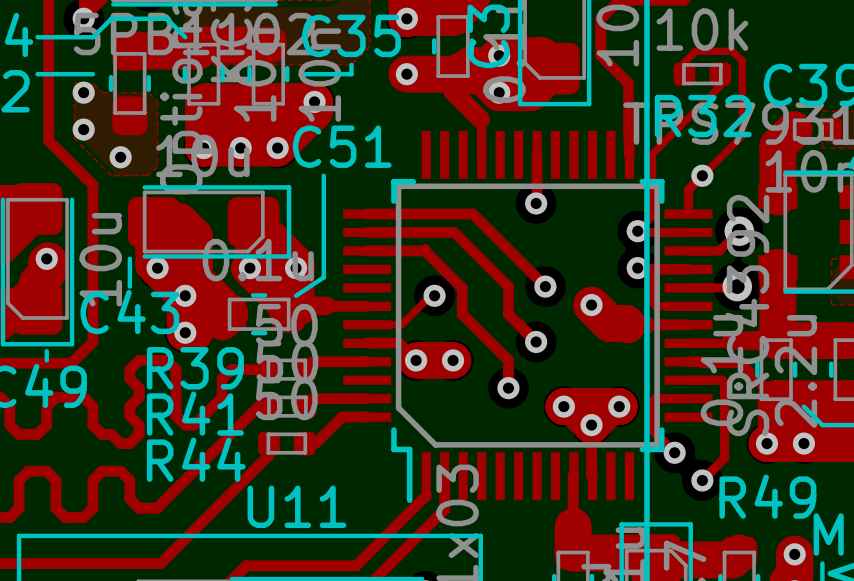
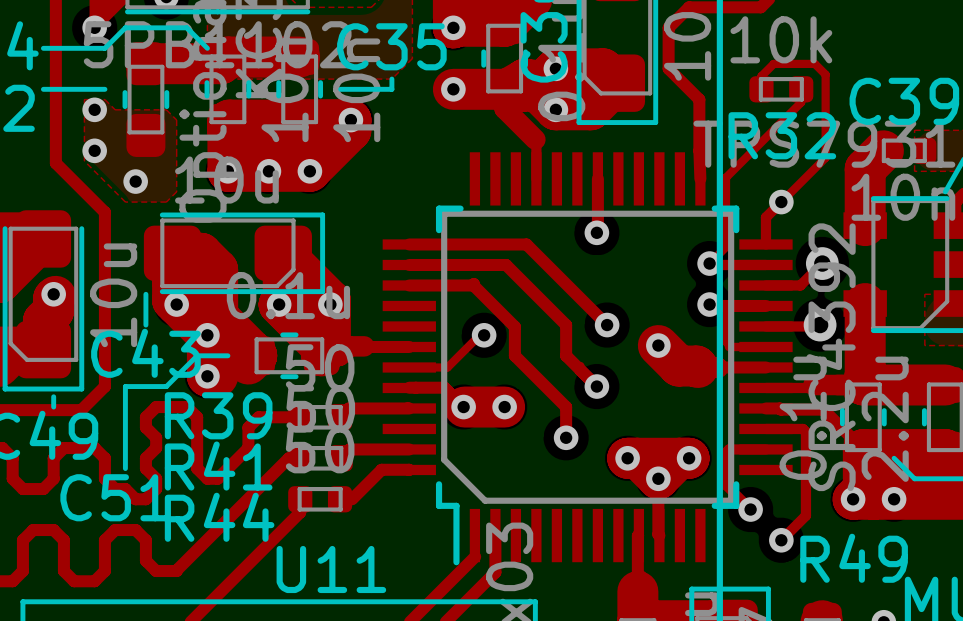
C51 name position: C51 (342, 146) -> C51 (115, 497)
line: (323, 175) (323, 277) (296, 295) -> none
line: none -> (227, 355) (197, 355) (166, 386) (125, 386) (125, 468)

